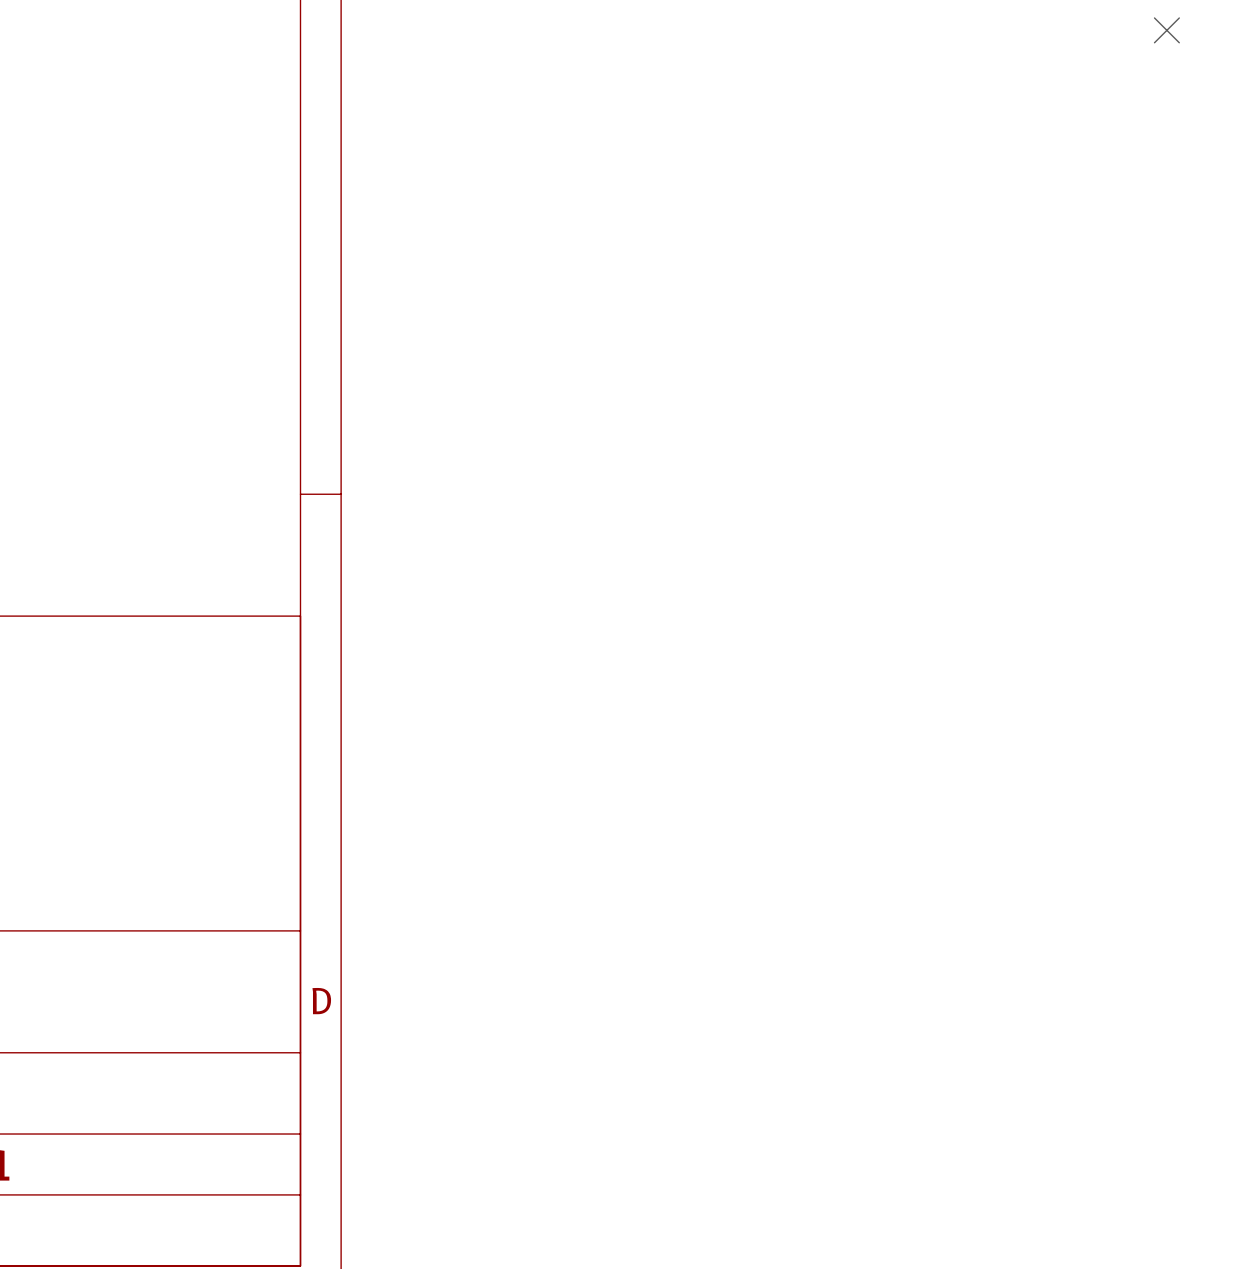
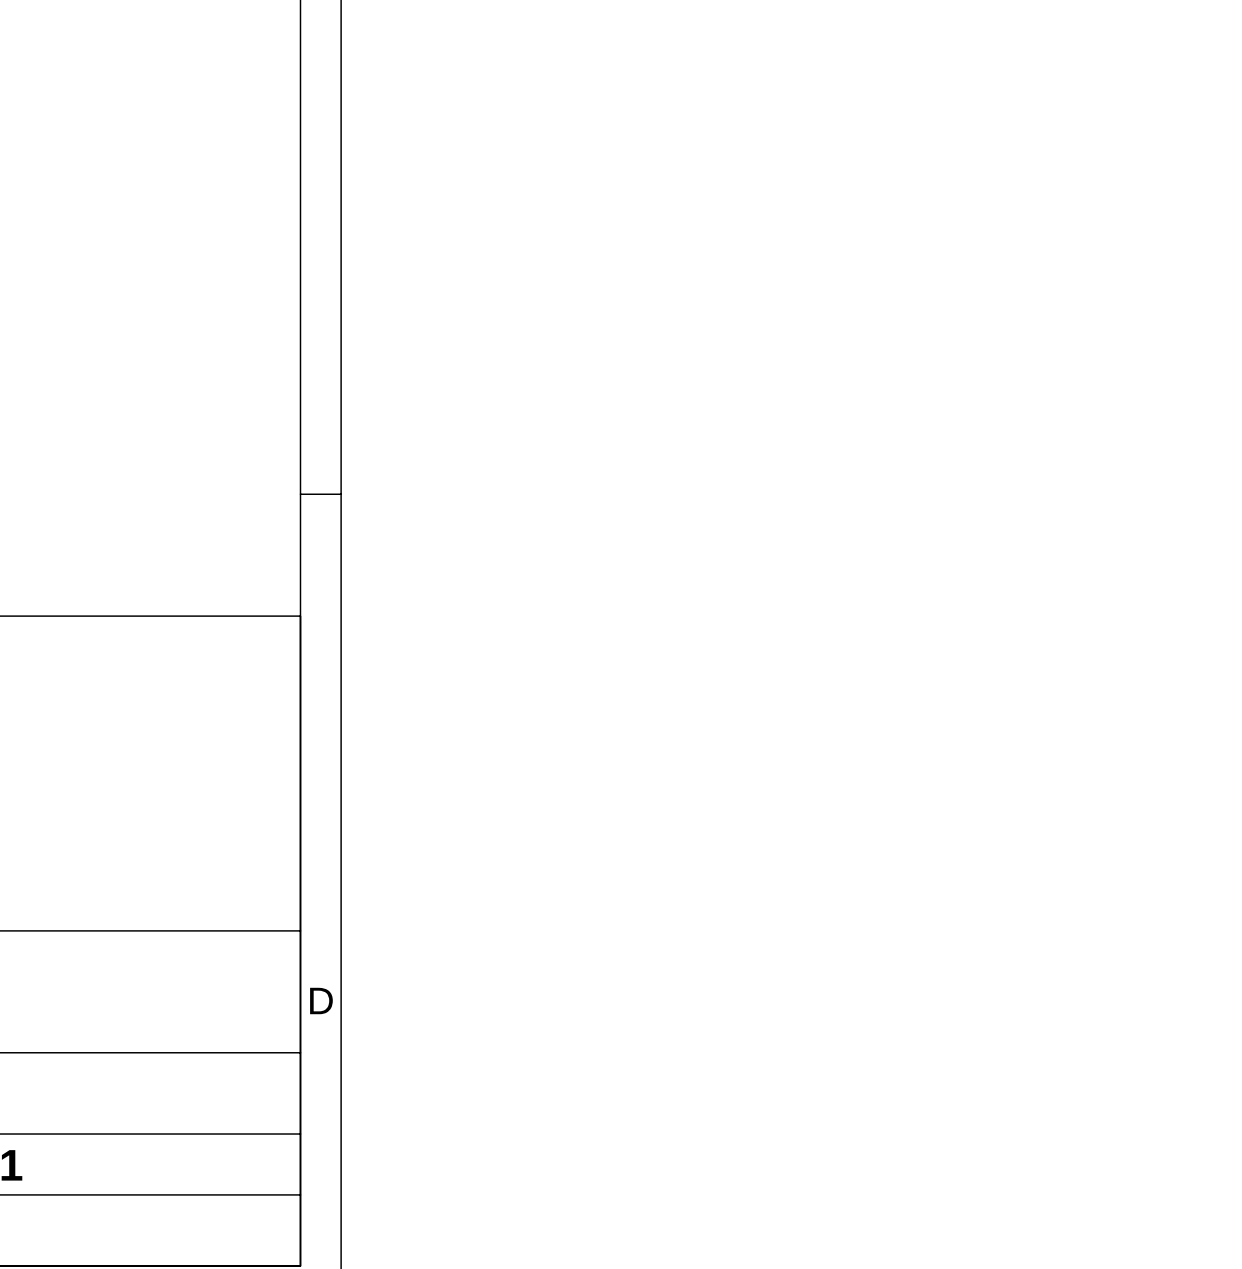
no-connect mark: (1166, 30) -> none

